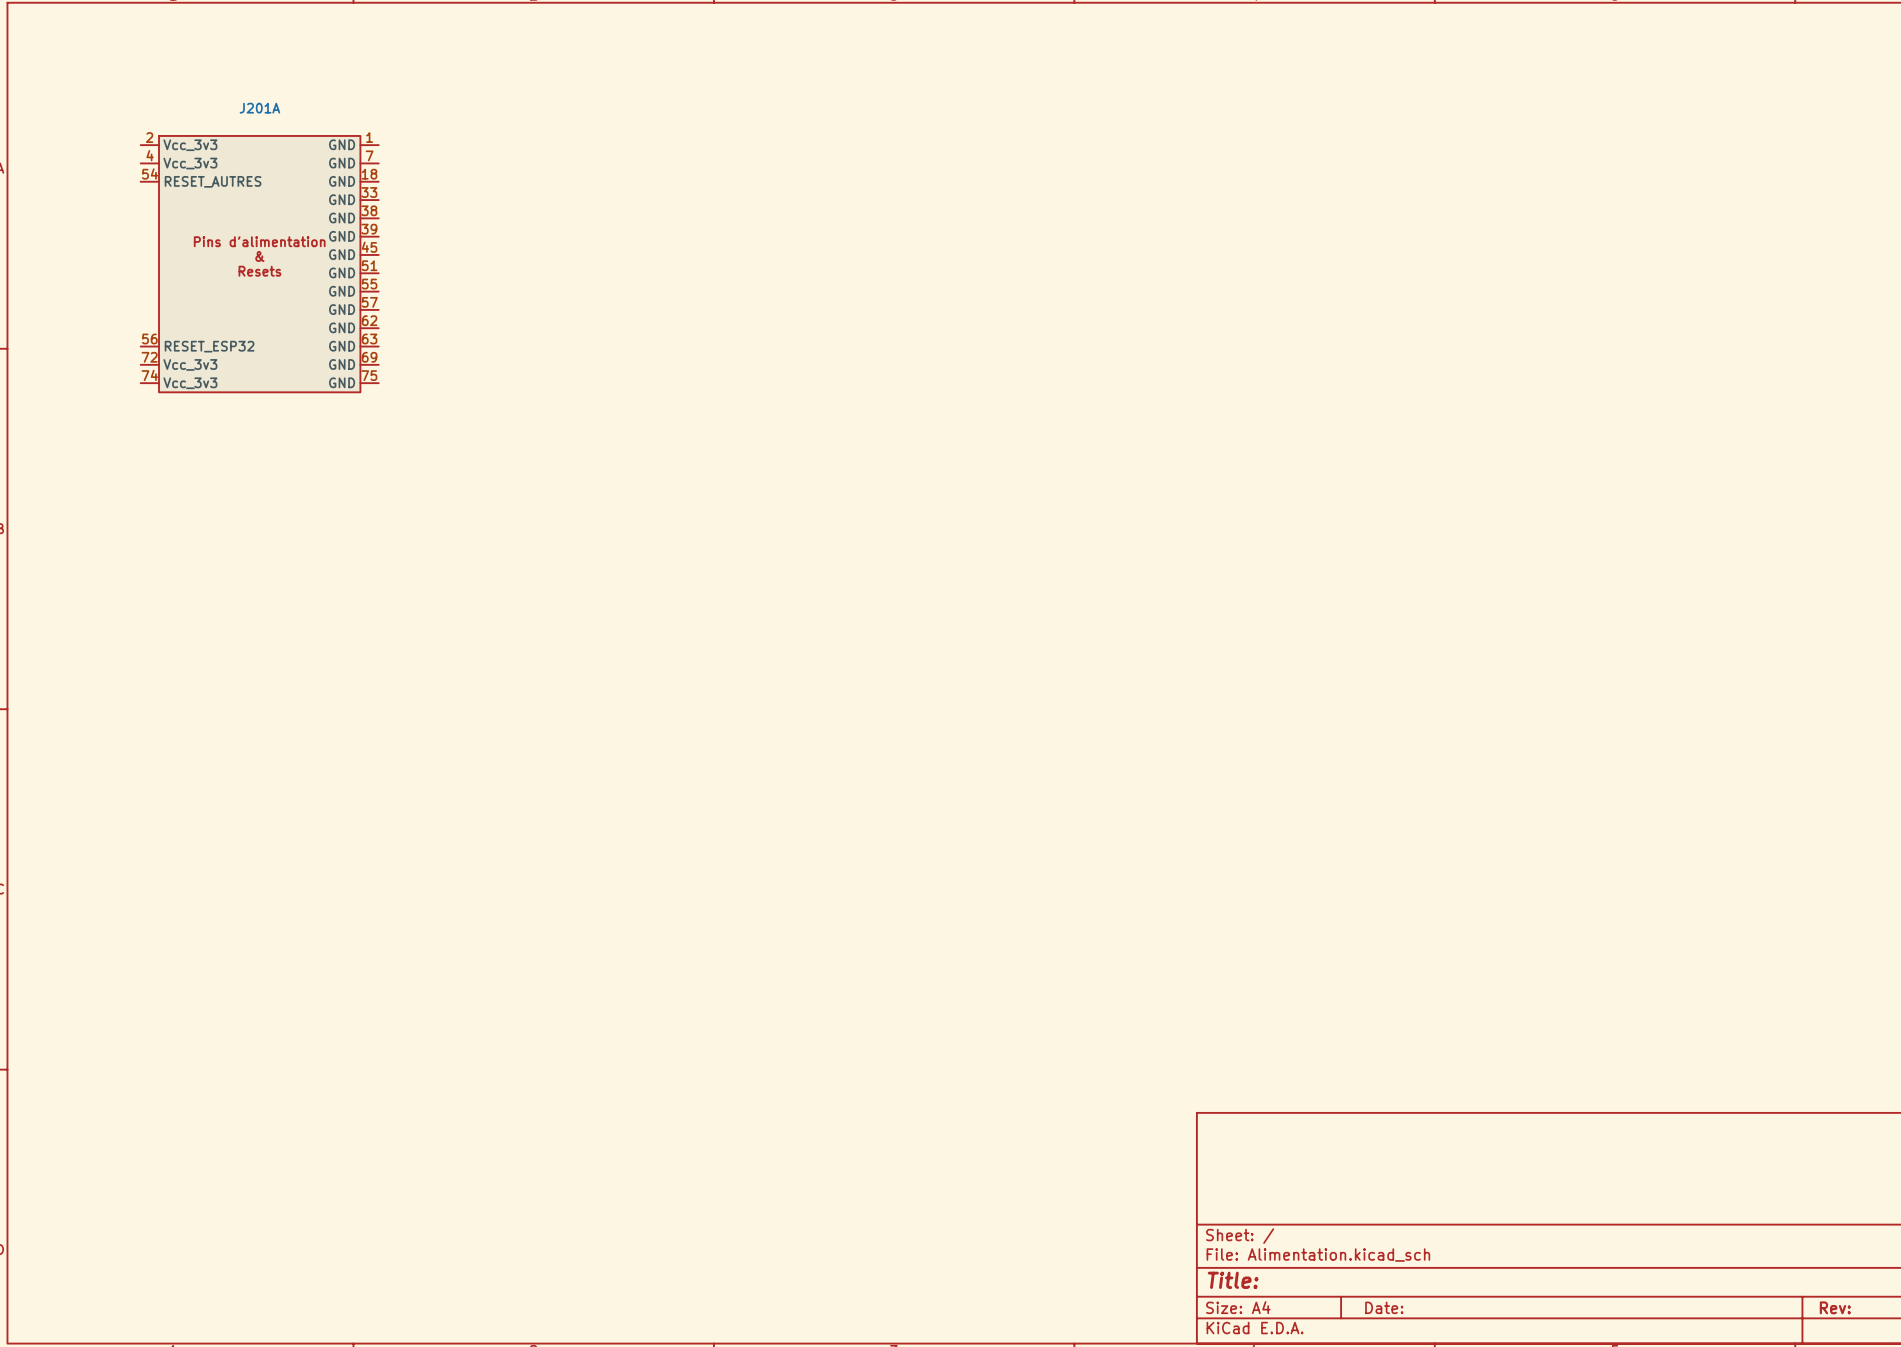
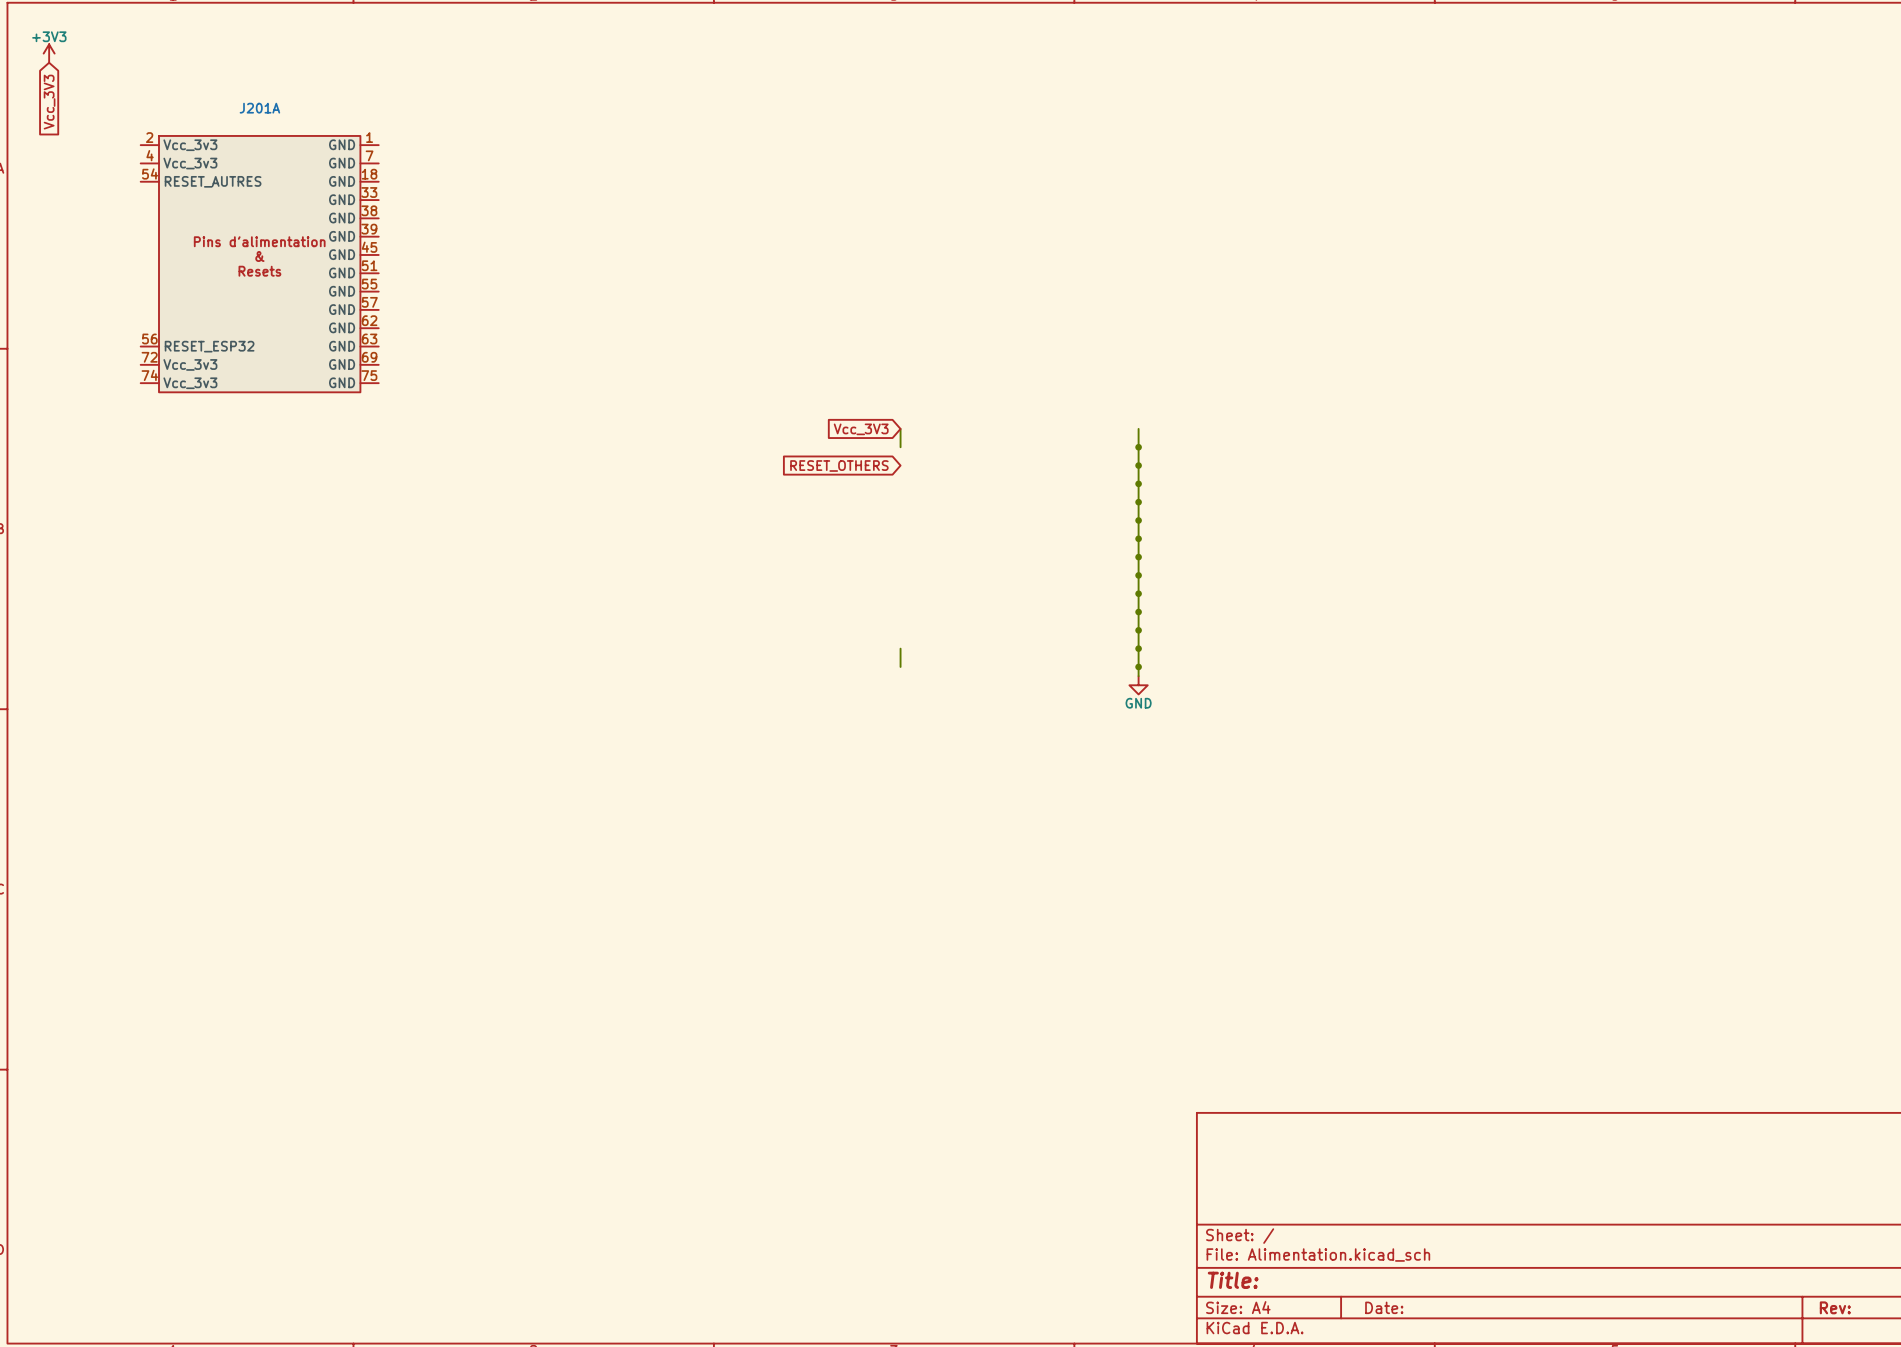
power symbol: none -> +3V3 (49, 53)
global label: none -> Vcc_3V3 (49, 102)
wire: none -> (900, 428) (900, 447)
wire: none -> (1138, 428) (1138, 676)
global label: none -> Vcc_3V3 (861, 429)
junction: none -> (1138, 447)
global label: none -> RESET_OTHERS (839, 465)
junction: none -> (1138, 465)
junction: none -> (1138, 483)
junction: none -> (1138, 502)
junction: none -> (1138, 520)
junction: none -> (1138, 538)
junction: none -> (1138, 557)
junction: none -> (1138, 575)
junction: none -> (1138, 593)
junction: none -> (1138, 612)
junction: none -> (1138, 630)
wire: none -> (900, 648) (900, 666)
junction: none -> (1138, 648)
junction: none -> (1138, 666)
power symbol: none -> GND (1138, 685)

